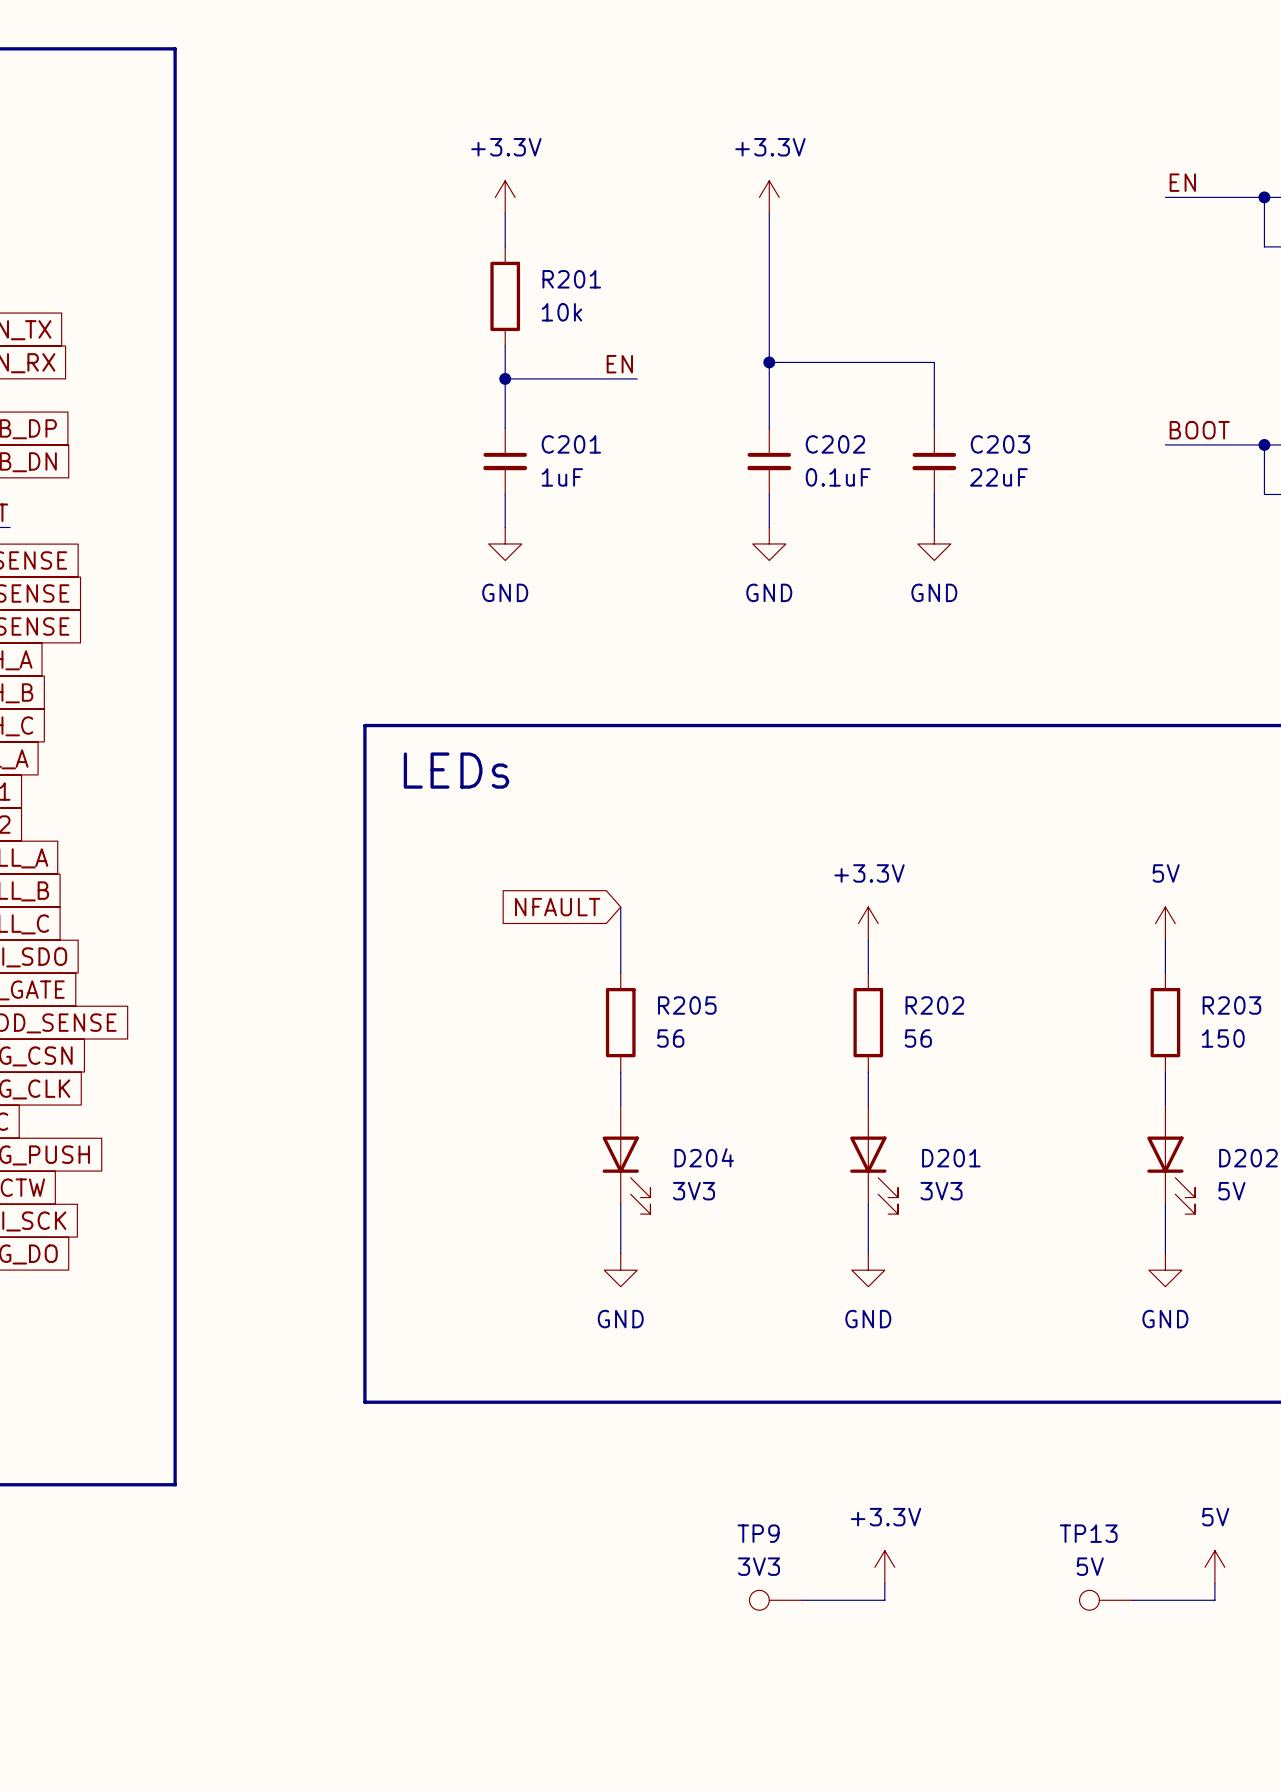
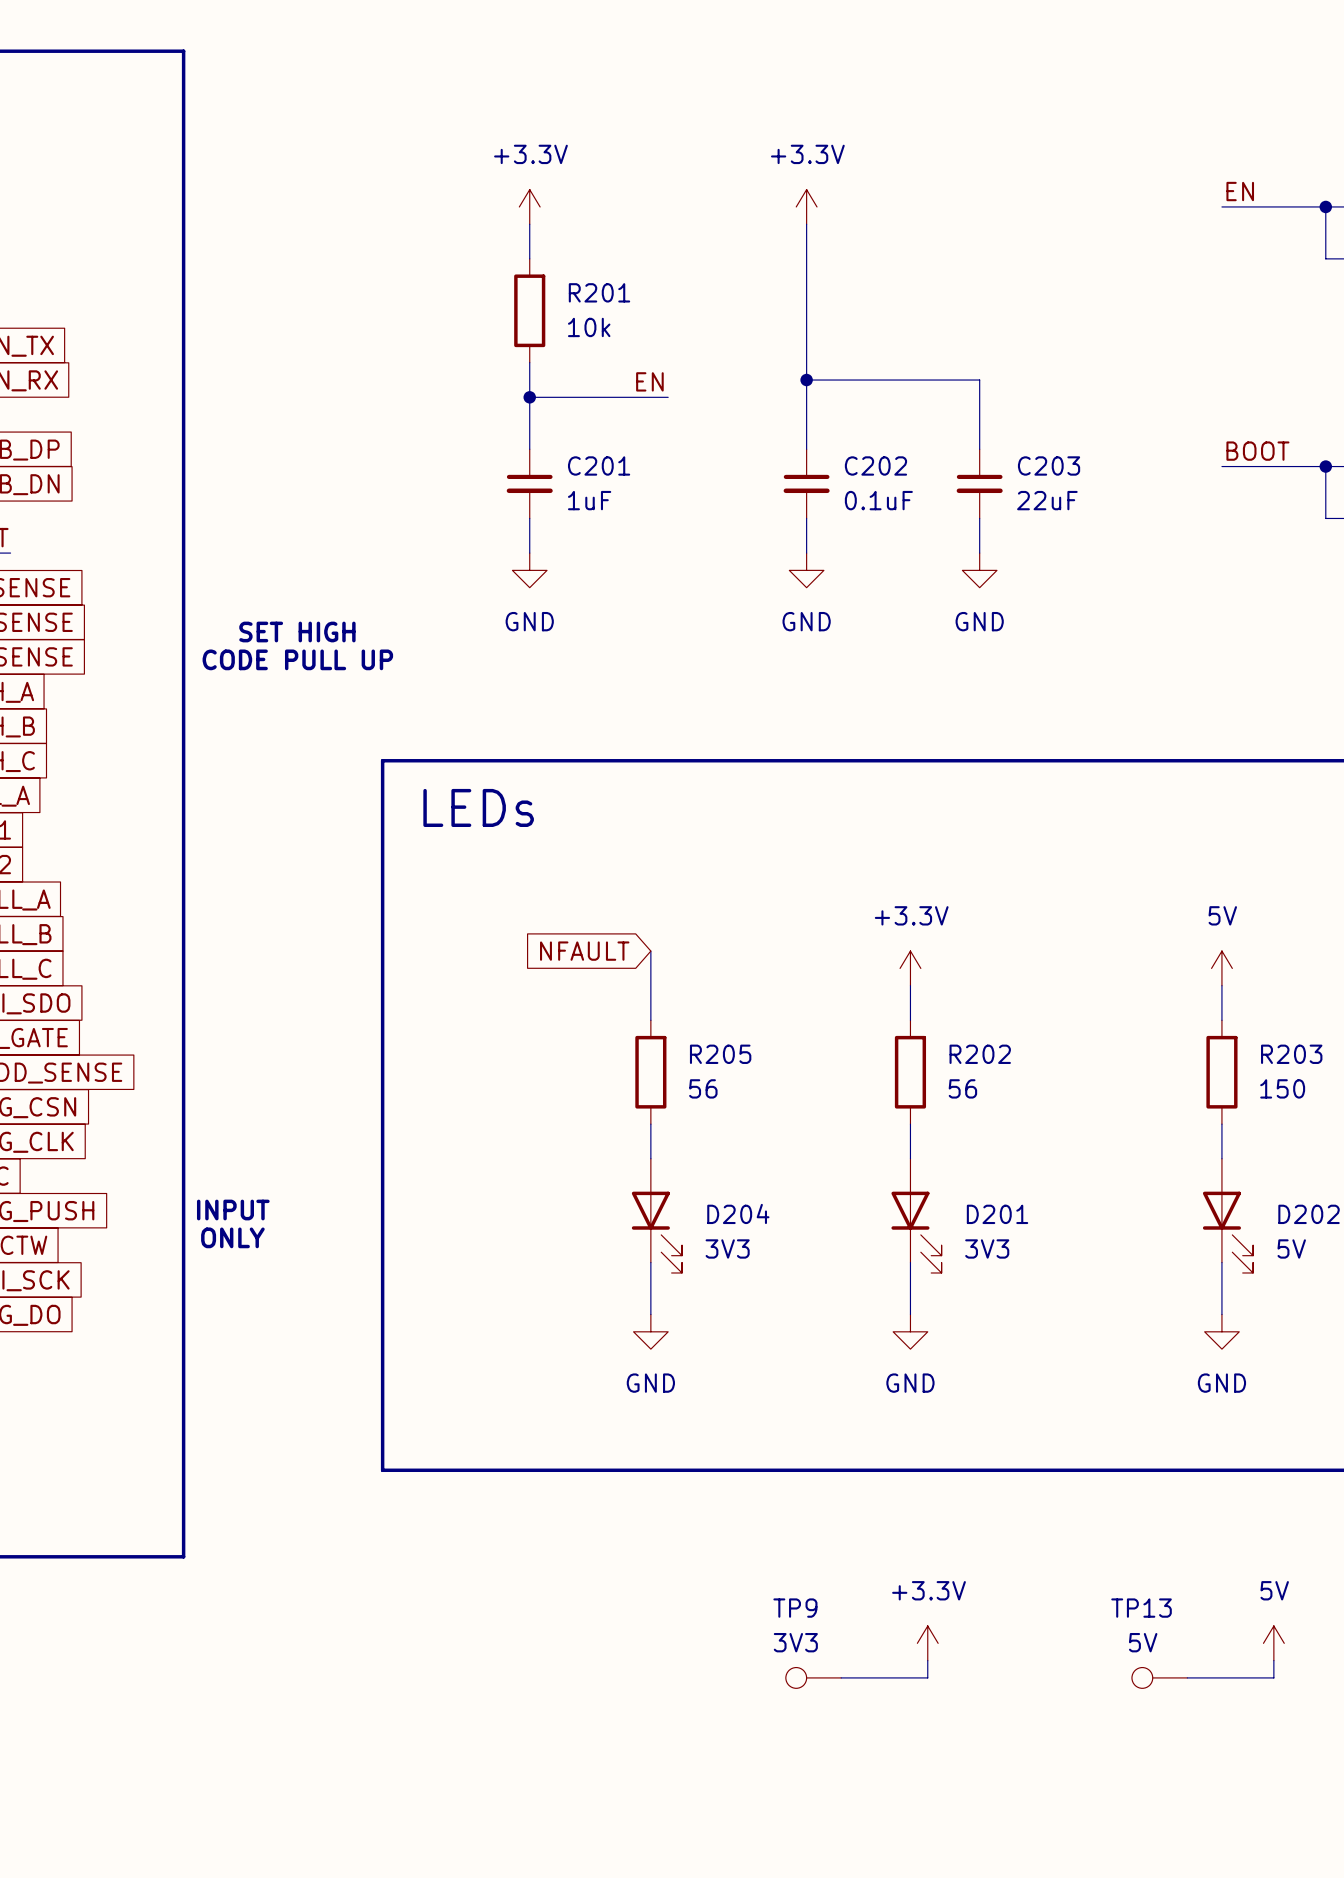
text: none -> SET HIGH (297, 632)
text: none -> CODE PULL UP (297, 659)
text: none -> INPUT (233, 1210)
text: none -> ONLY (232, 1237)

